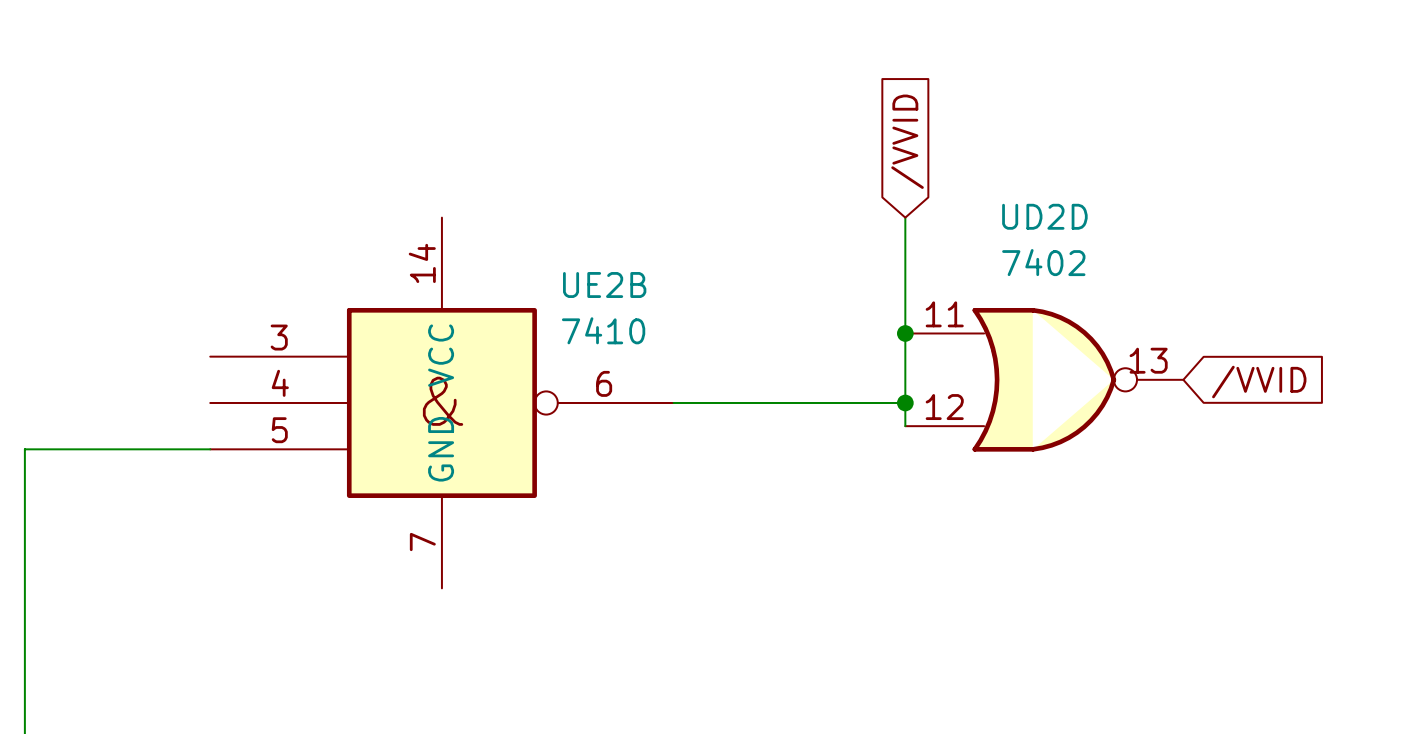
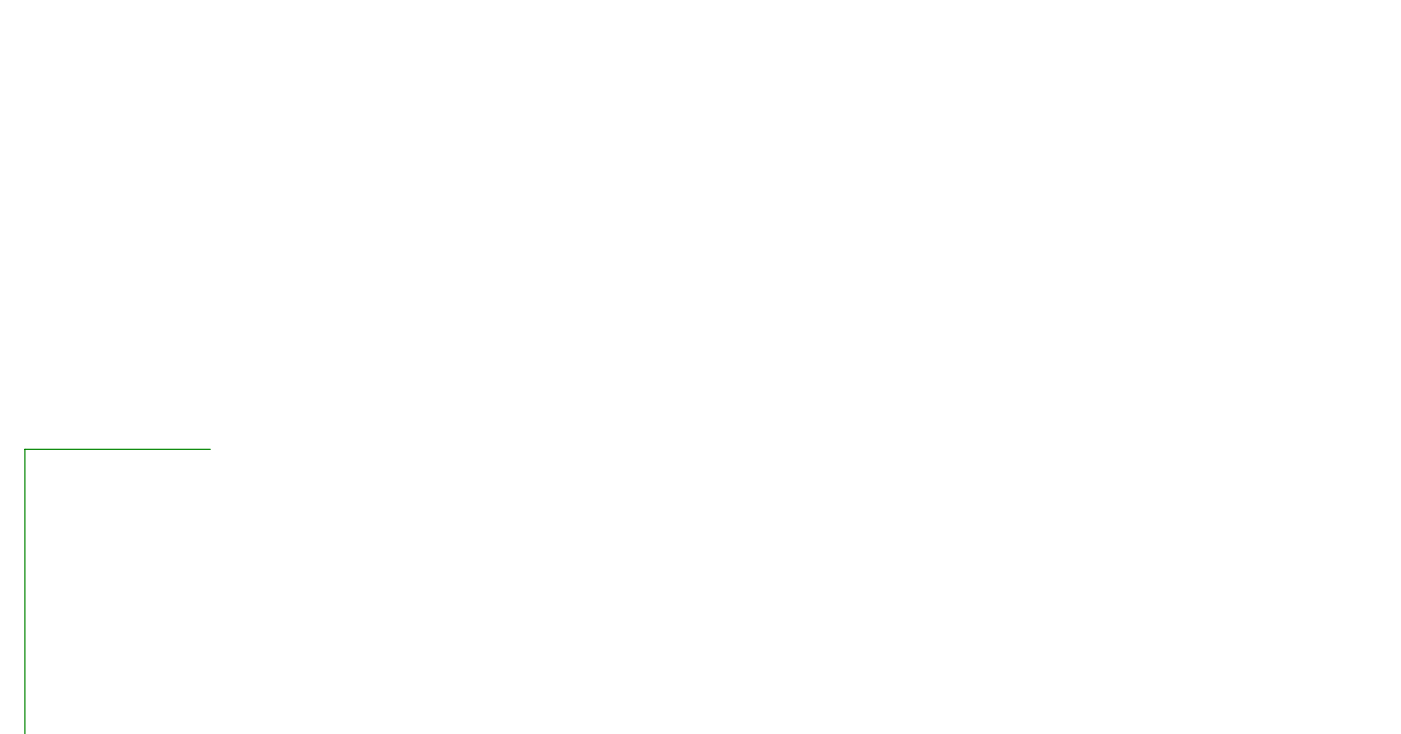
global label: /VVID (907, 141) -> none
wire: (905, 217) (905, 426) -> none
junction: (905, 333) -> none
UD2D: 7402 (1044, 379) -> none
global label: /VVID (1259, 382) -> none
UE2B: 7410 (441, 402) -> none
wire: (673, 402) (905, 402) -> none
junction: (905, 402) -> none

